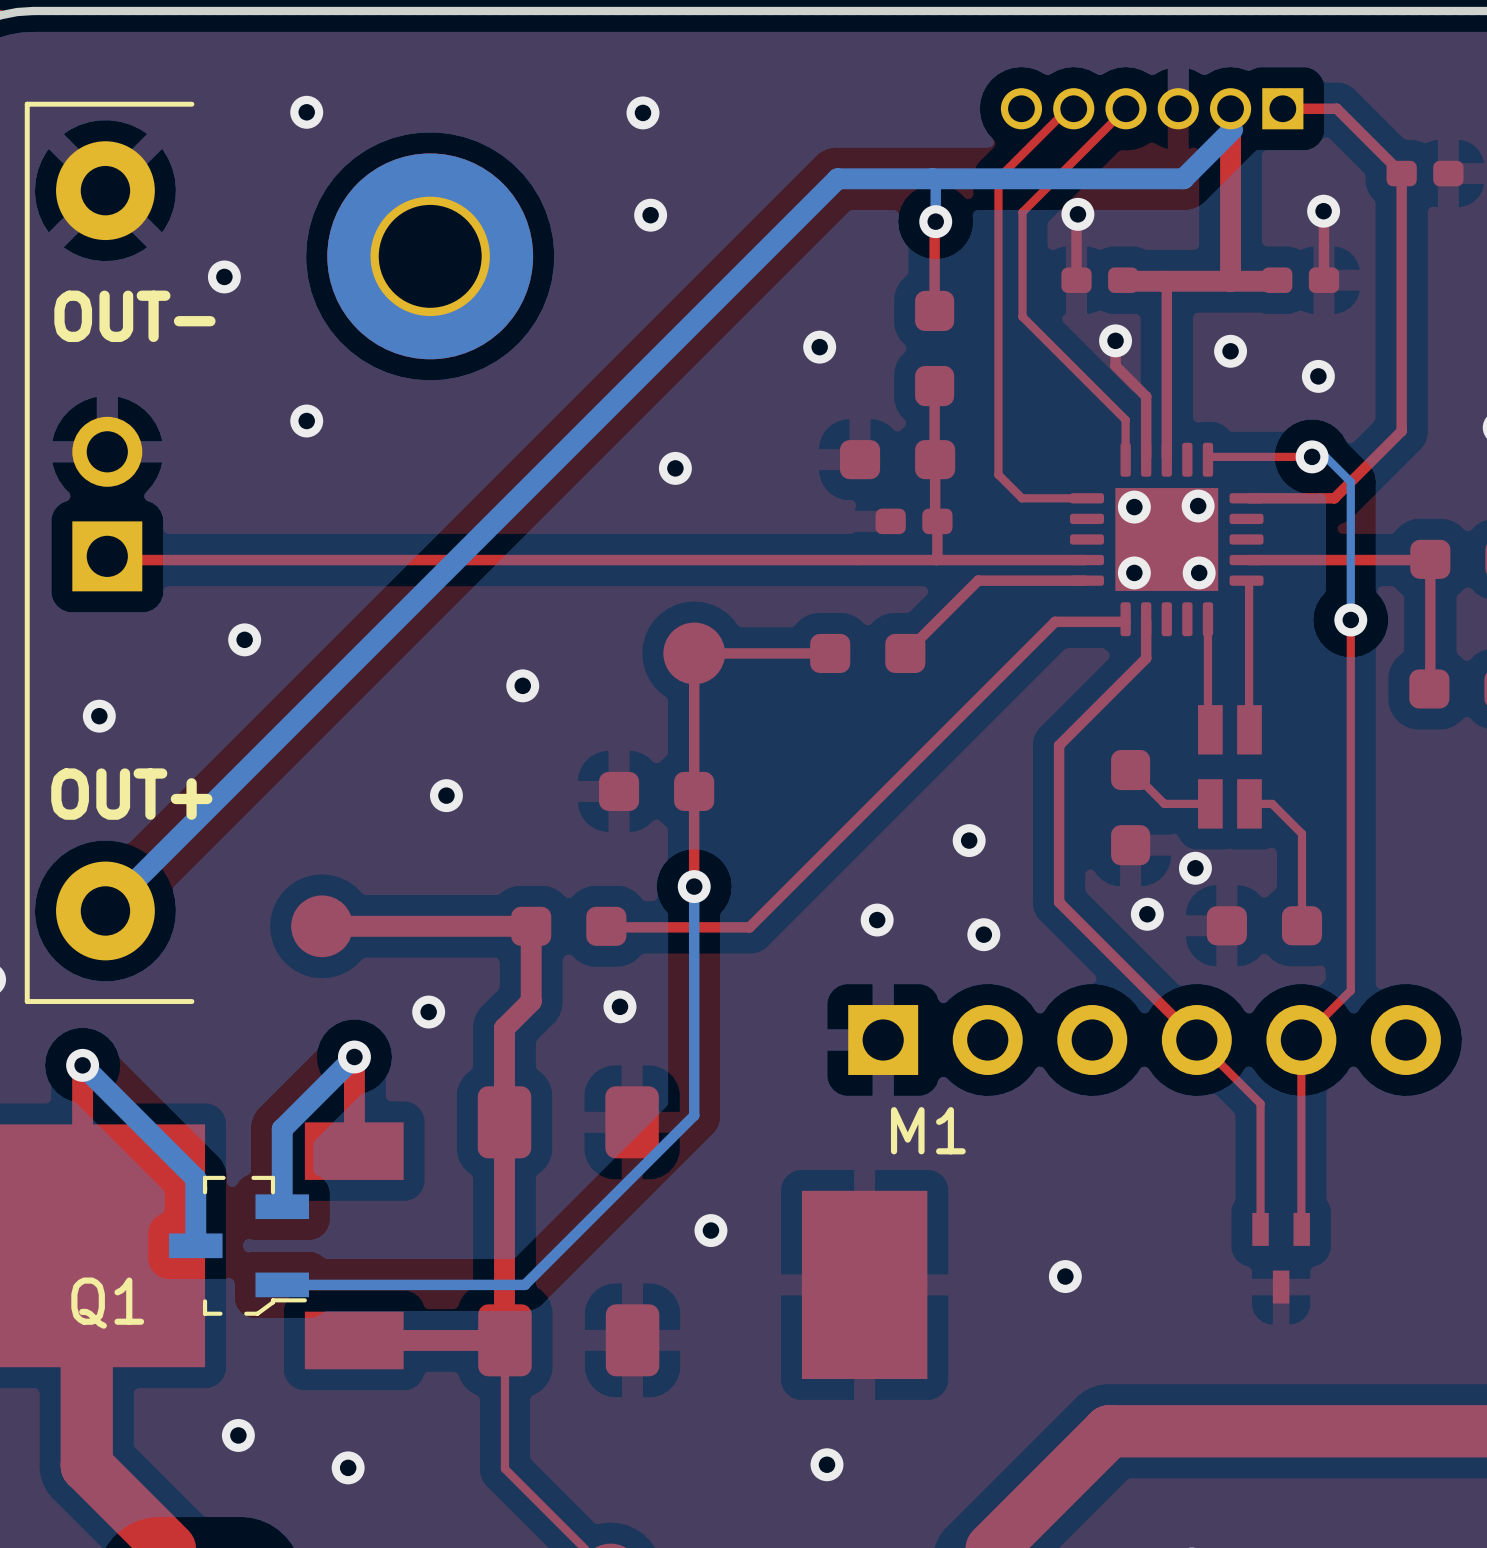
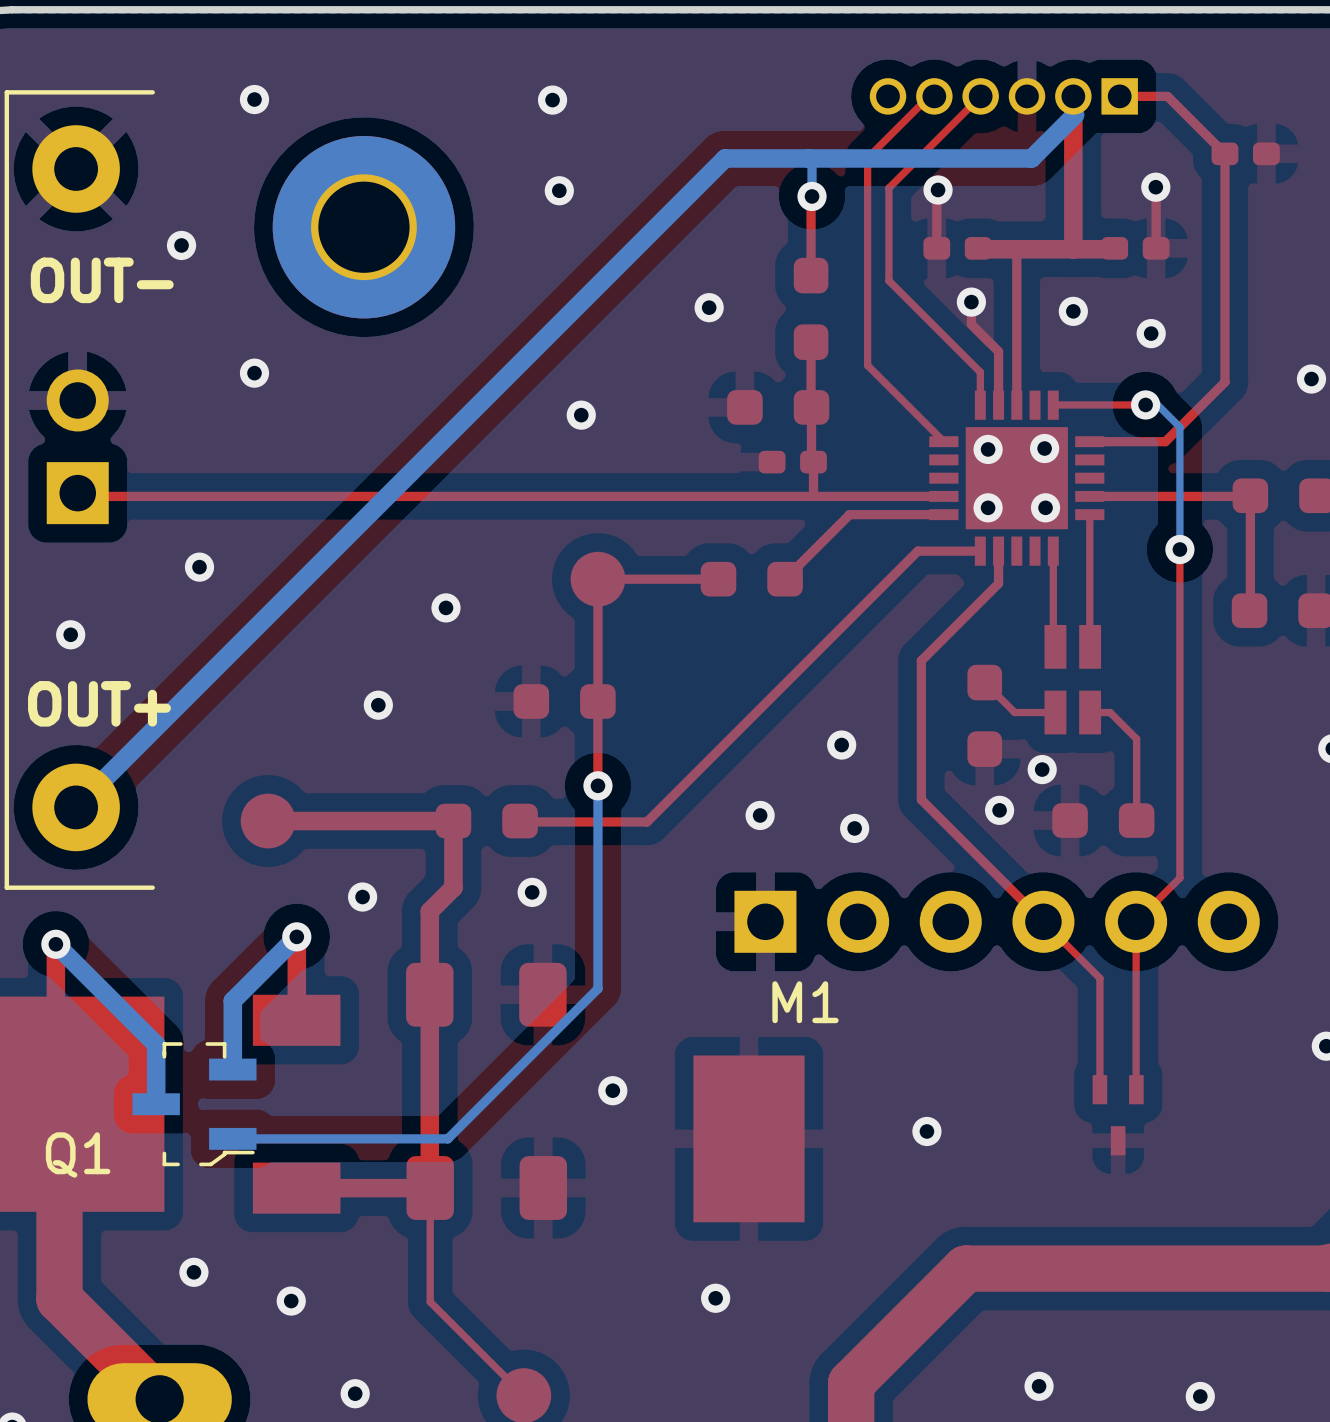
top track: (998, 412) (998, 474) (1022, 498) (1084, 498) -> (867, 365) (943, 441)
part footprint: [1070, 442, 1264, 637] -> [929, 390, 1105, 566]

